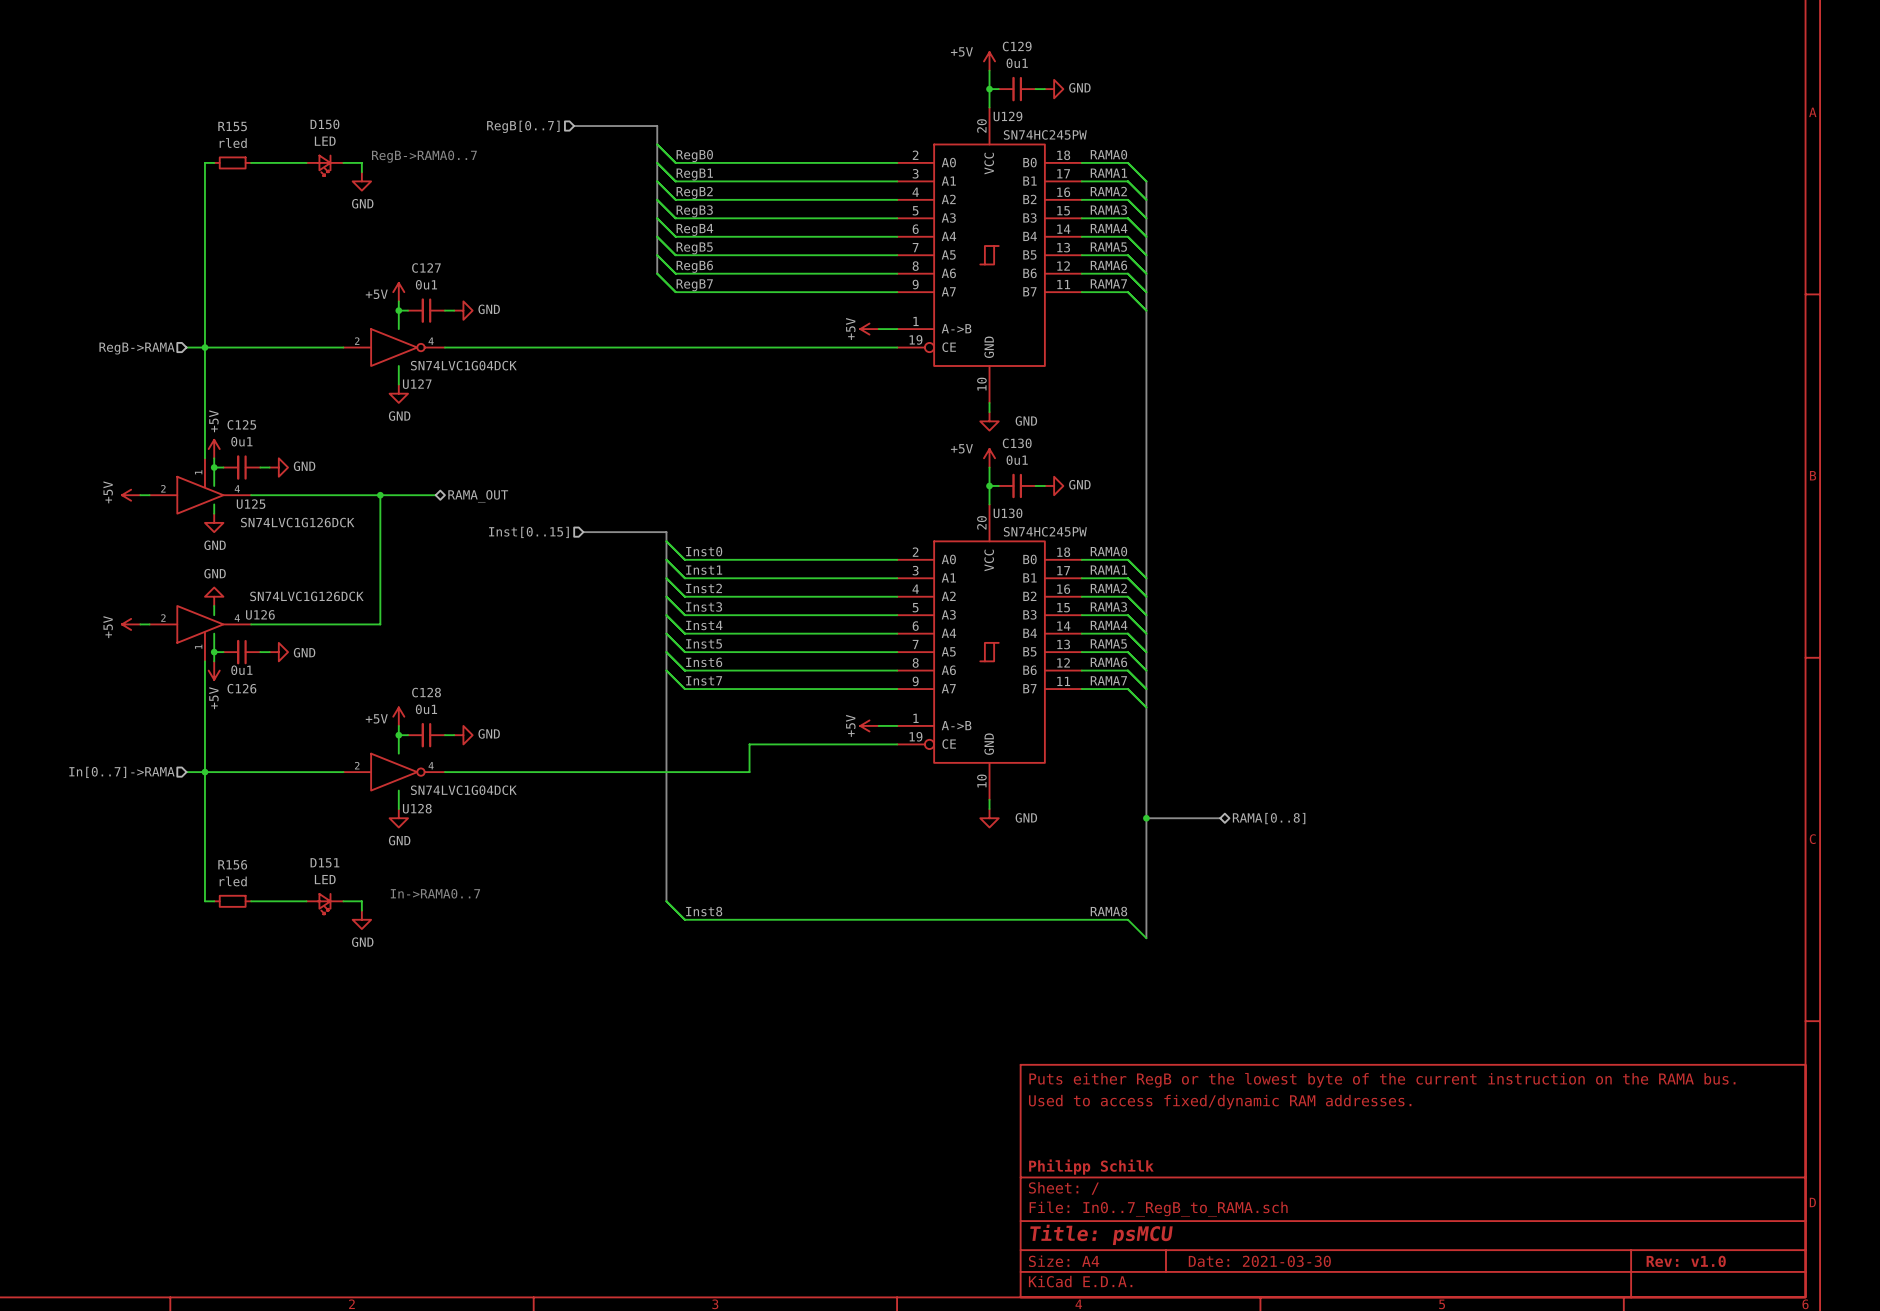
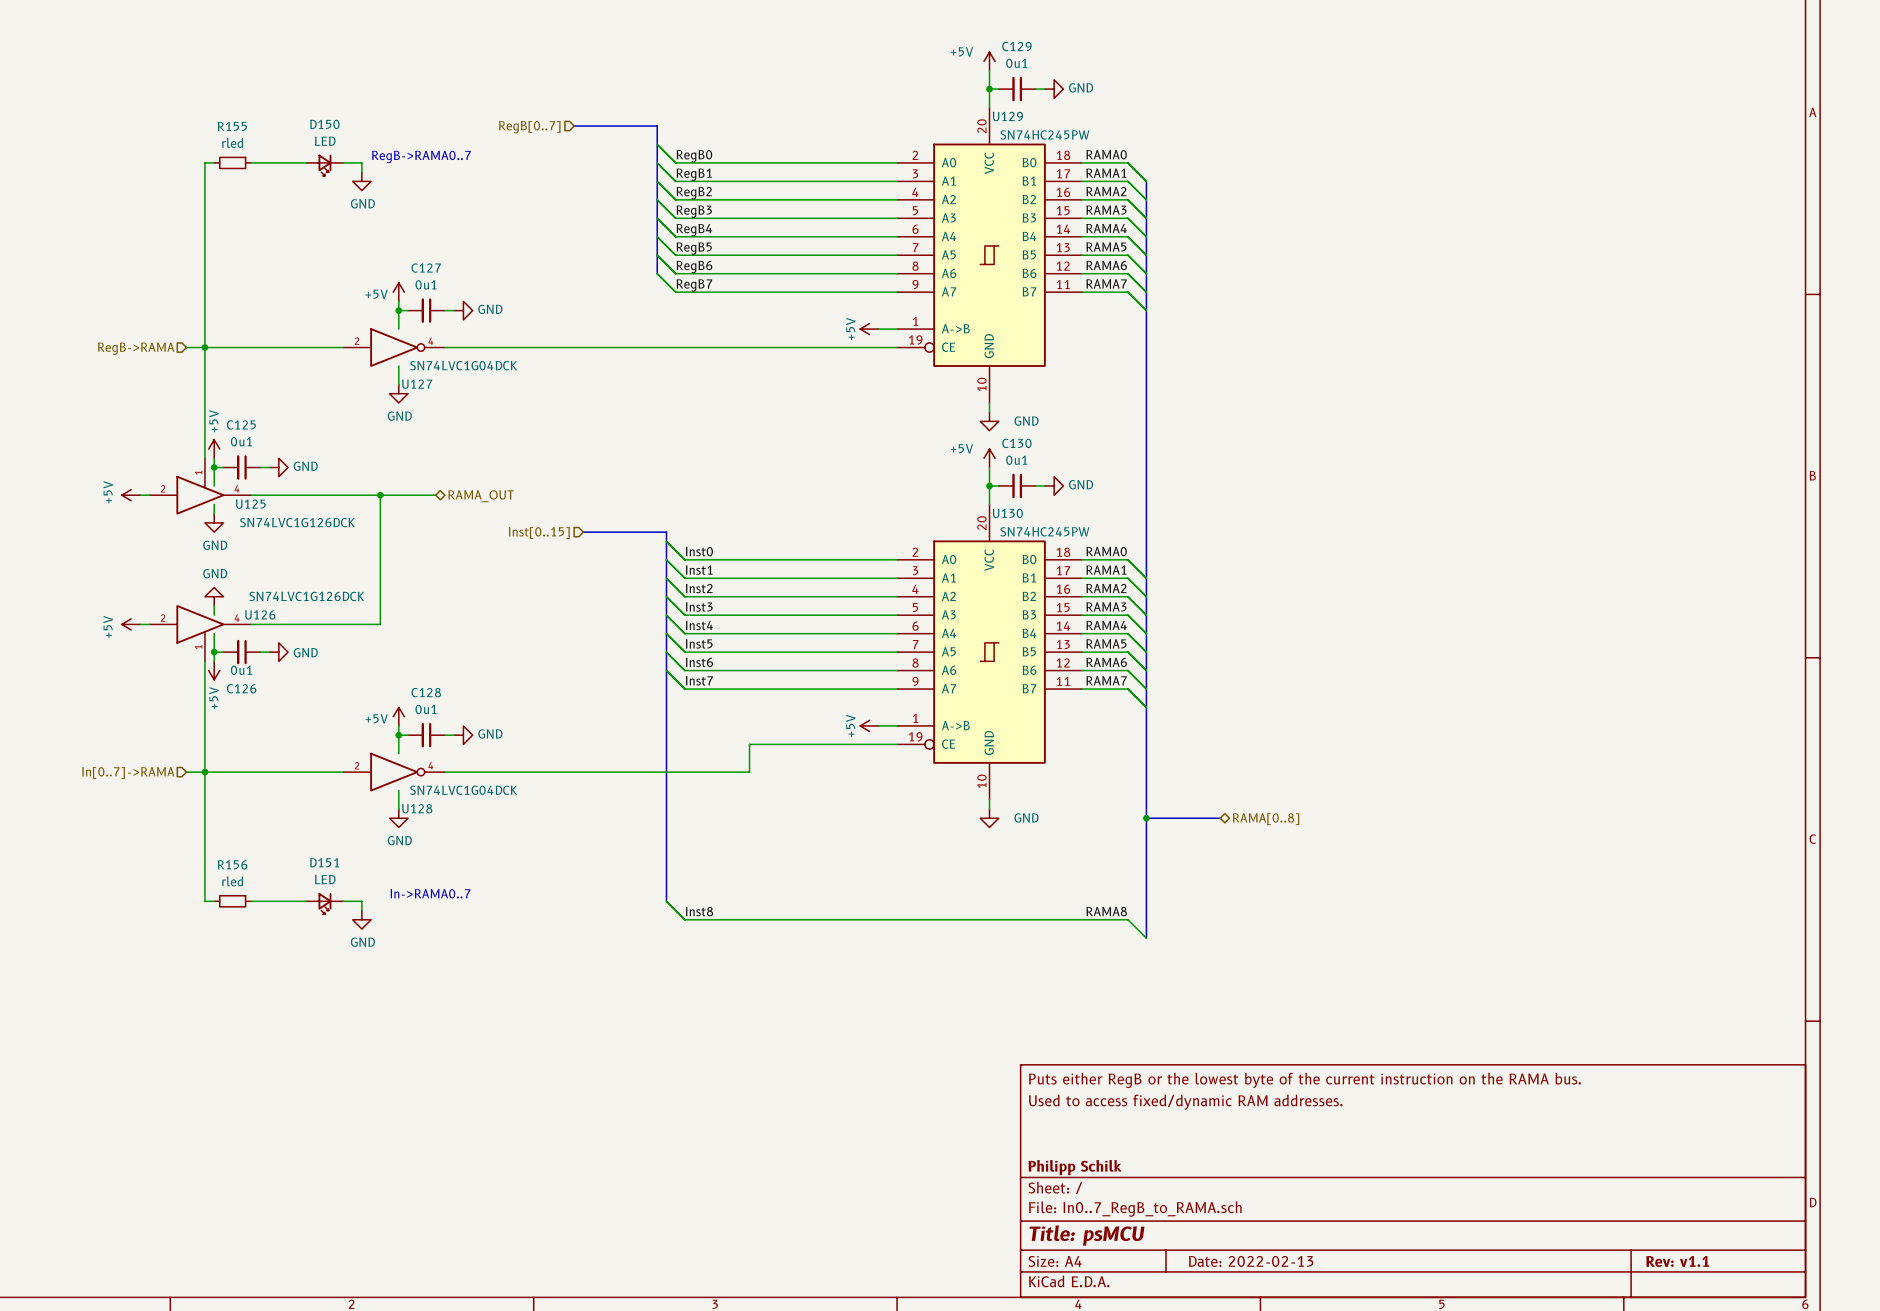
title block: Date: 2021-03-30 (1259, 1261) -> Date: 2022-02-13 (1251, 1261)
title block: Rev: v1.0 (1686, 1261) -> Rev: v1.1 (1677, 1261)

